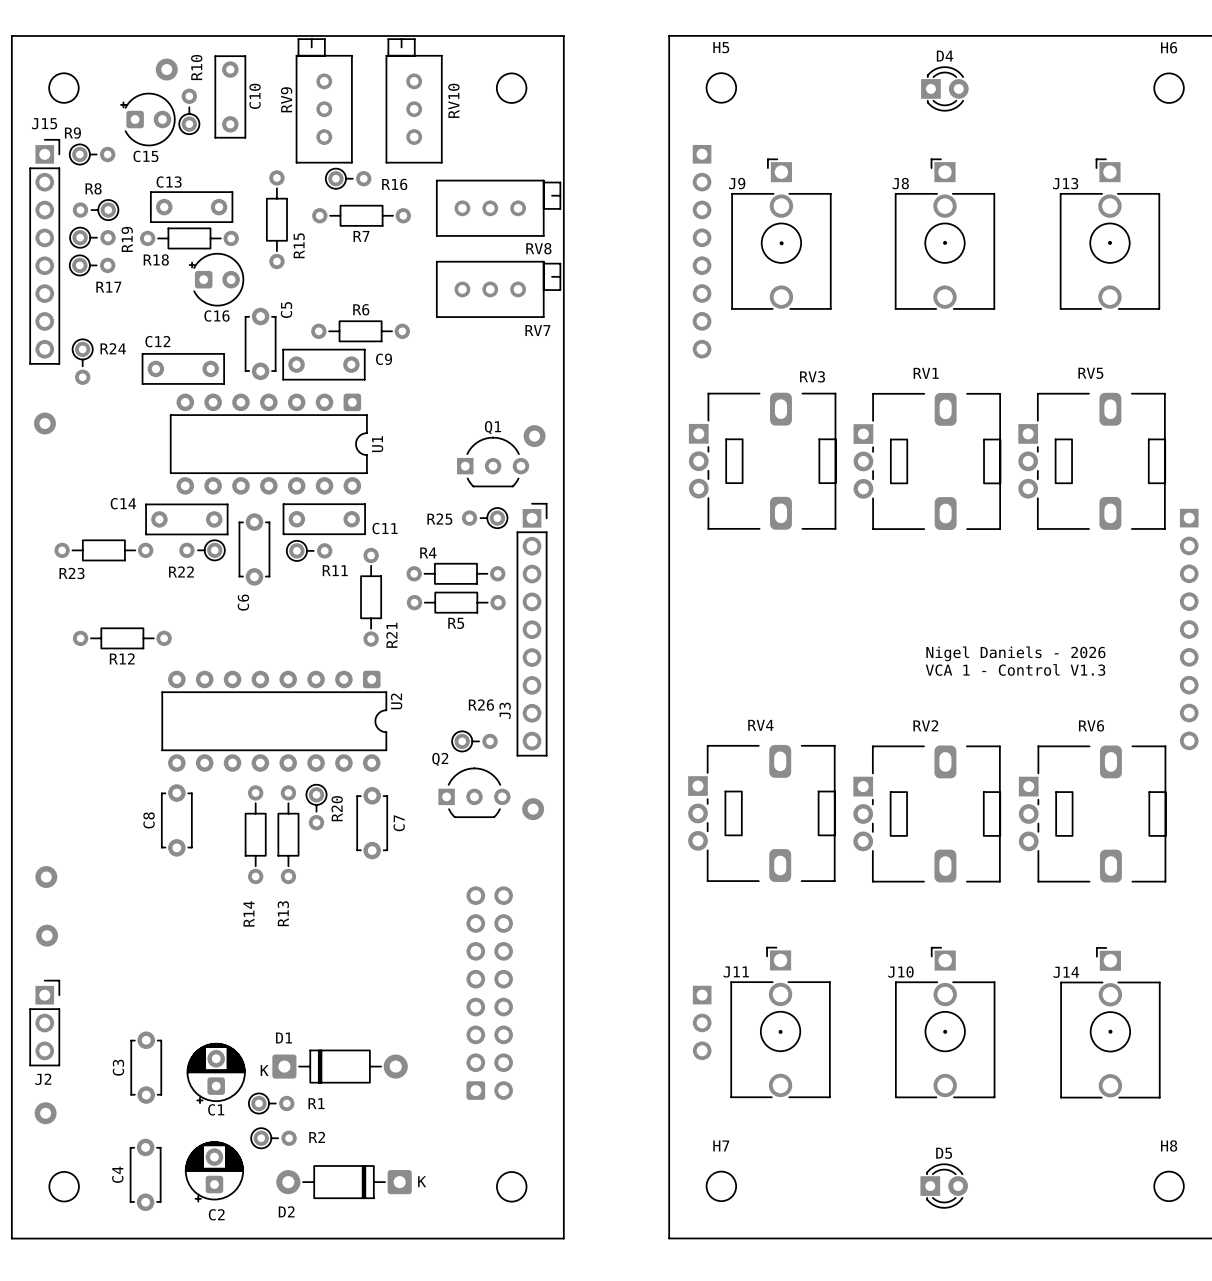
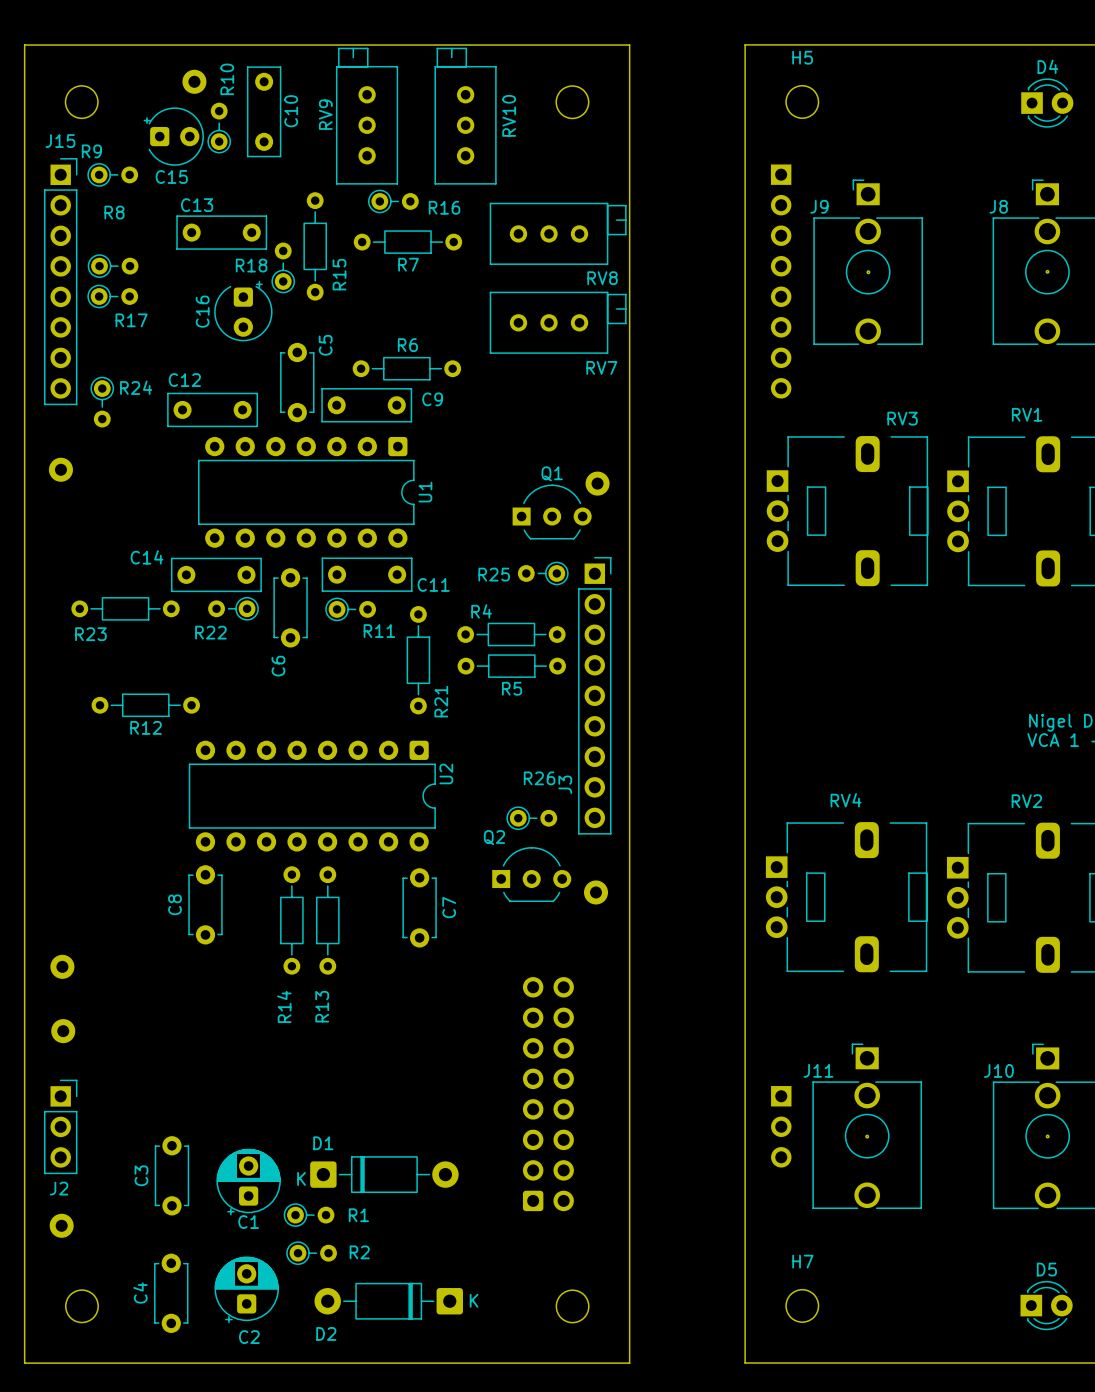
R19: (95, 210) -> none
R18 footprint: [140, 227, 239, 250] -> [271, 242, 296, 294]
R18 name position: R18 (156, 259) -> R18 (251, 265)
C16 rotation: 0° (216, 279) -> 90° clockwise (243, 311)
R20: (316, 807) -> none

